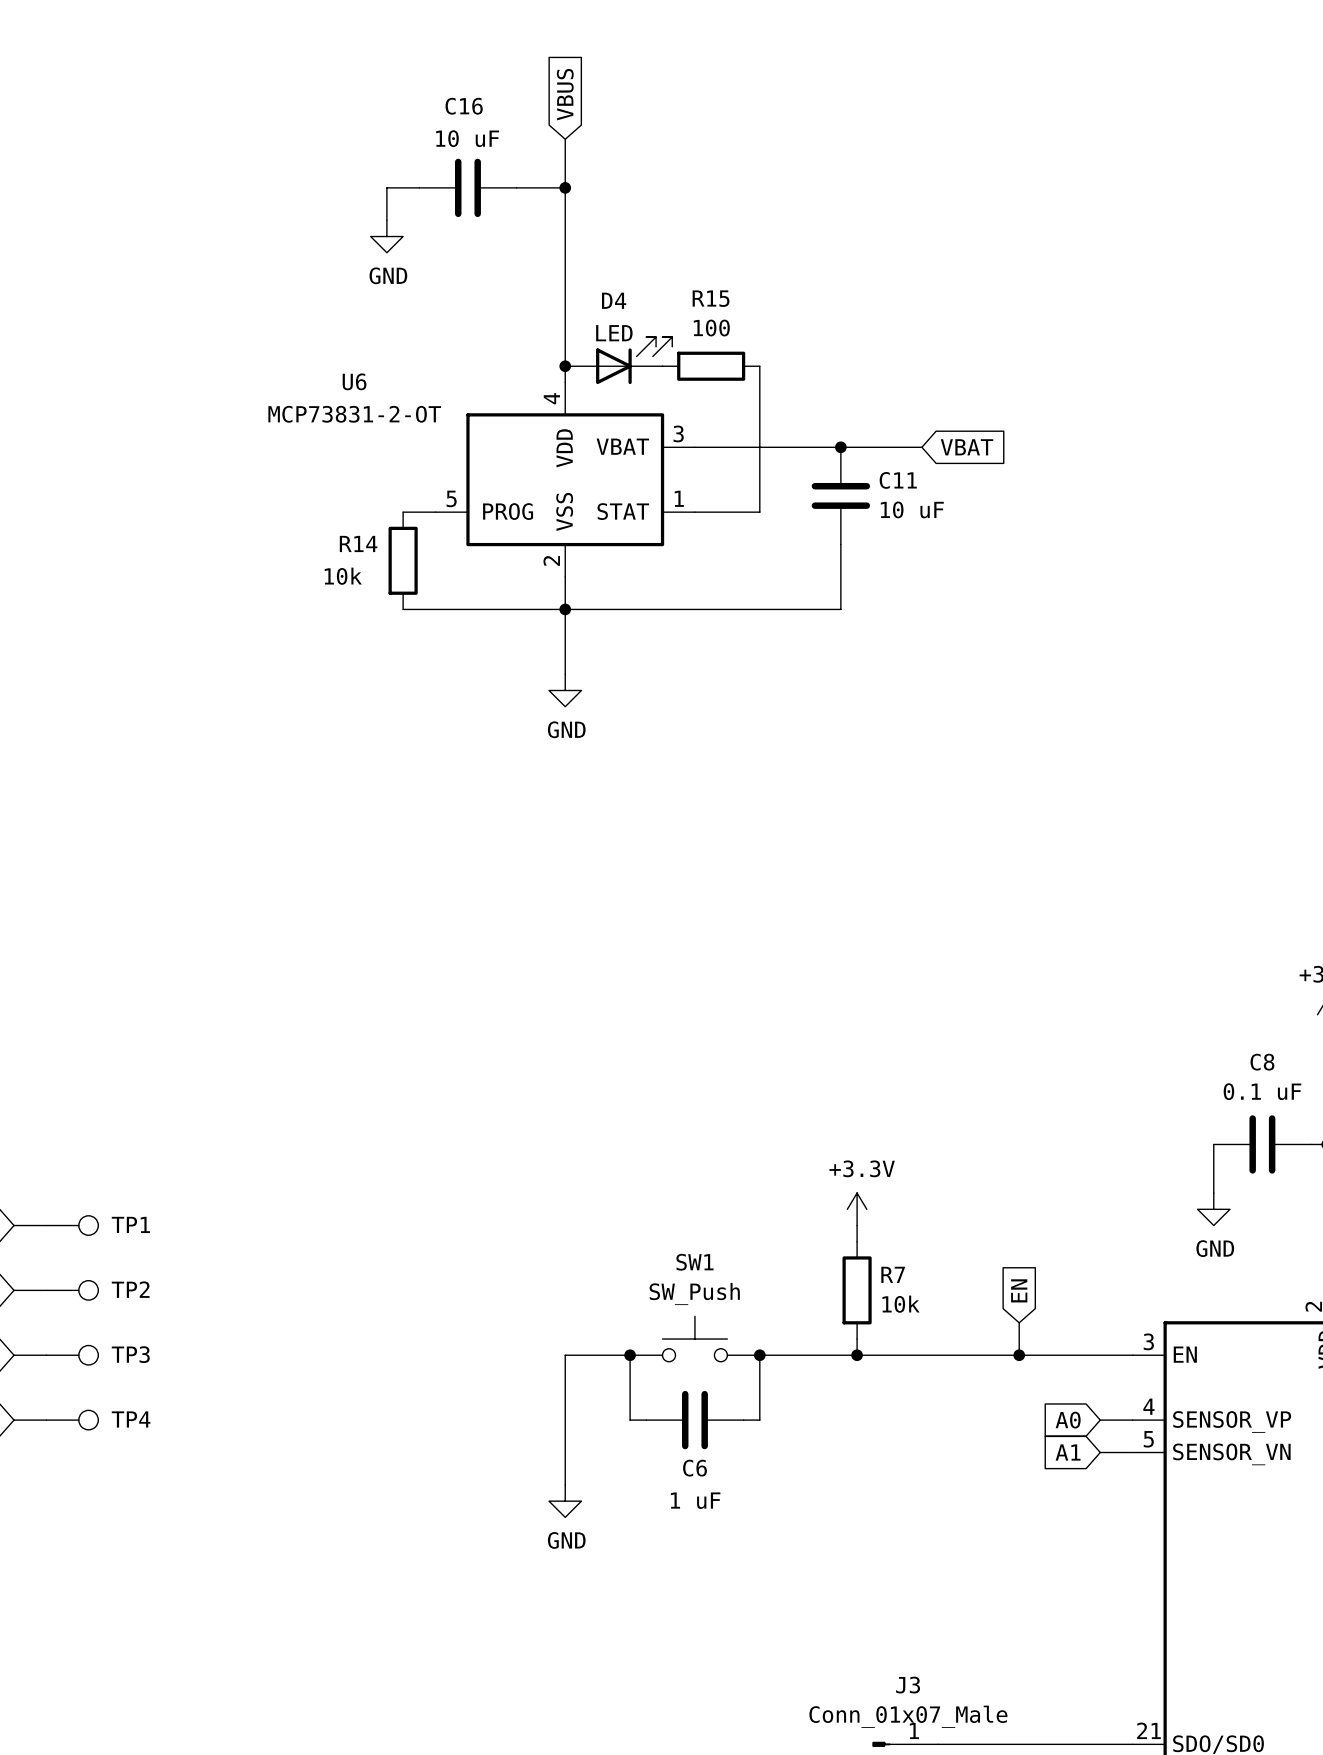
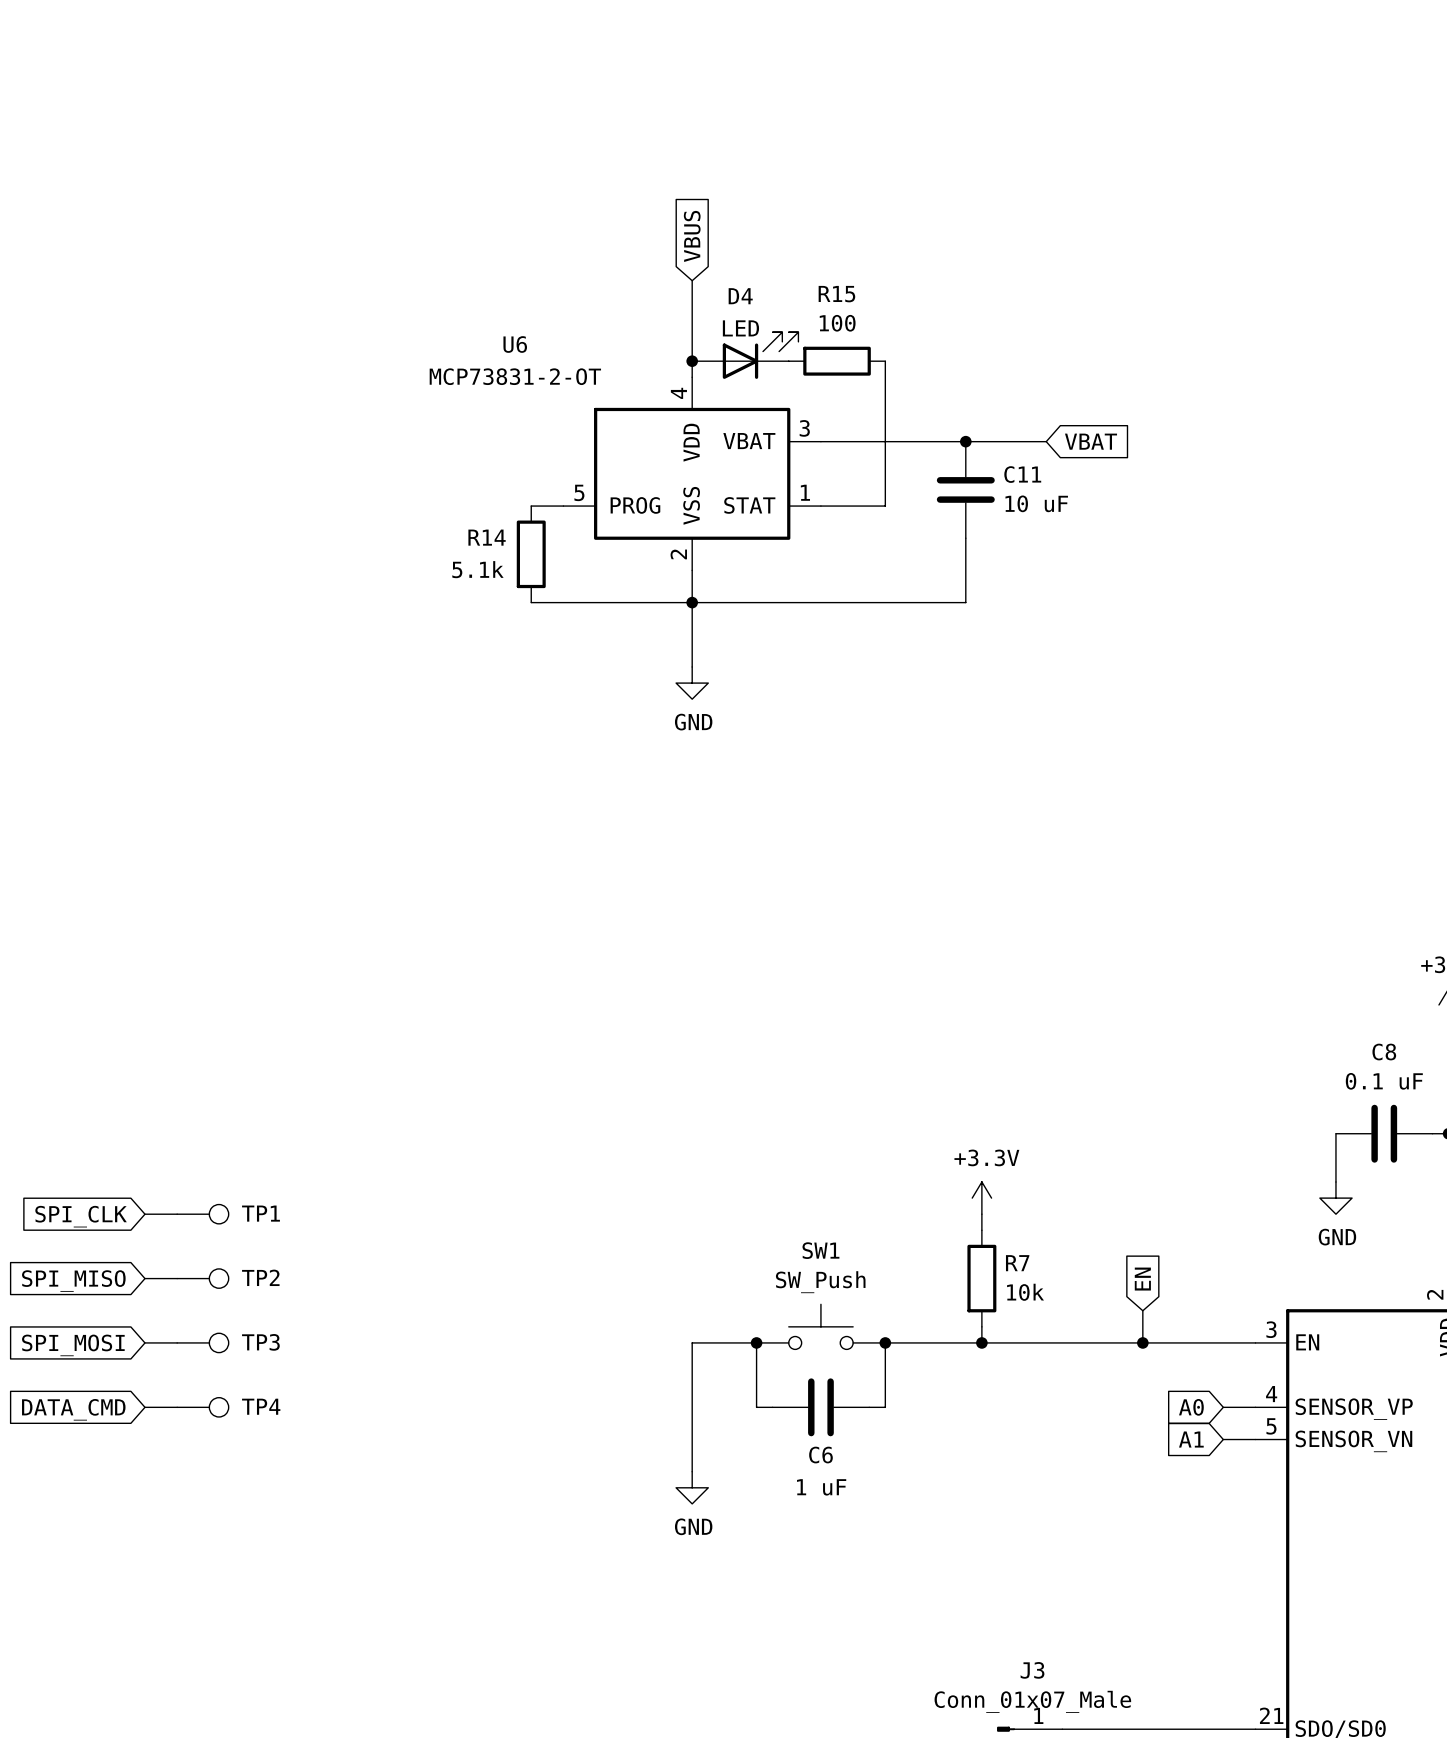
global label position: VBUS (565, 94) -> VBUS (692, 236)
wire: (565, 139) (565, 285) -> none
wire: (419, 187) (386, 187) (386, 220) -> none
C16: 10 uF (467, 187) -> none
wire: (516, 187) (565, 187) -> none
junction: (565, 187) -> none
power symbol: GND (386, 236) -> none
U6 name position: U6 (354, 381) -> U6 (515, 344)
U6 value position: MCP73831-2-OT (354, 414) -> MCP73831-2-OT (515, 376)
R14 value: 10k (343, 576) -> 5.1k (477, 569)

